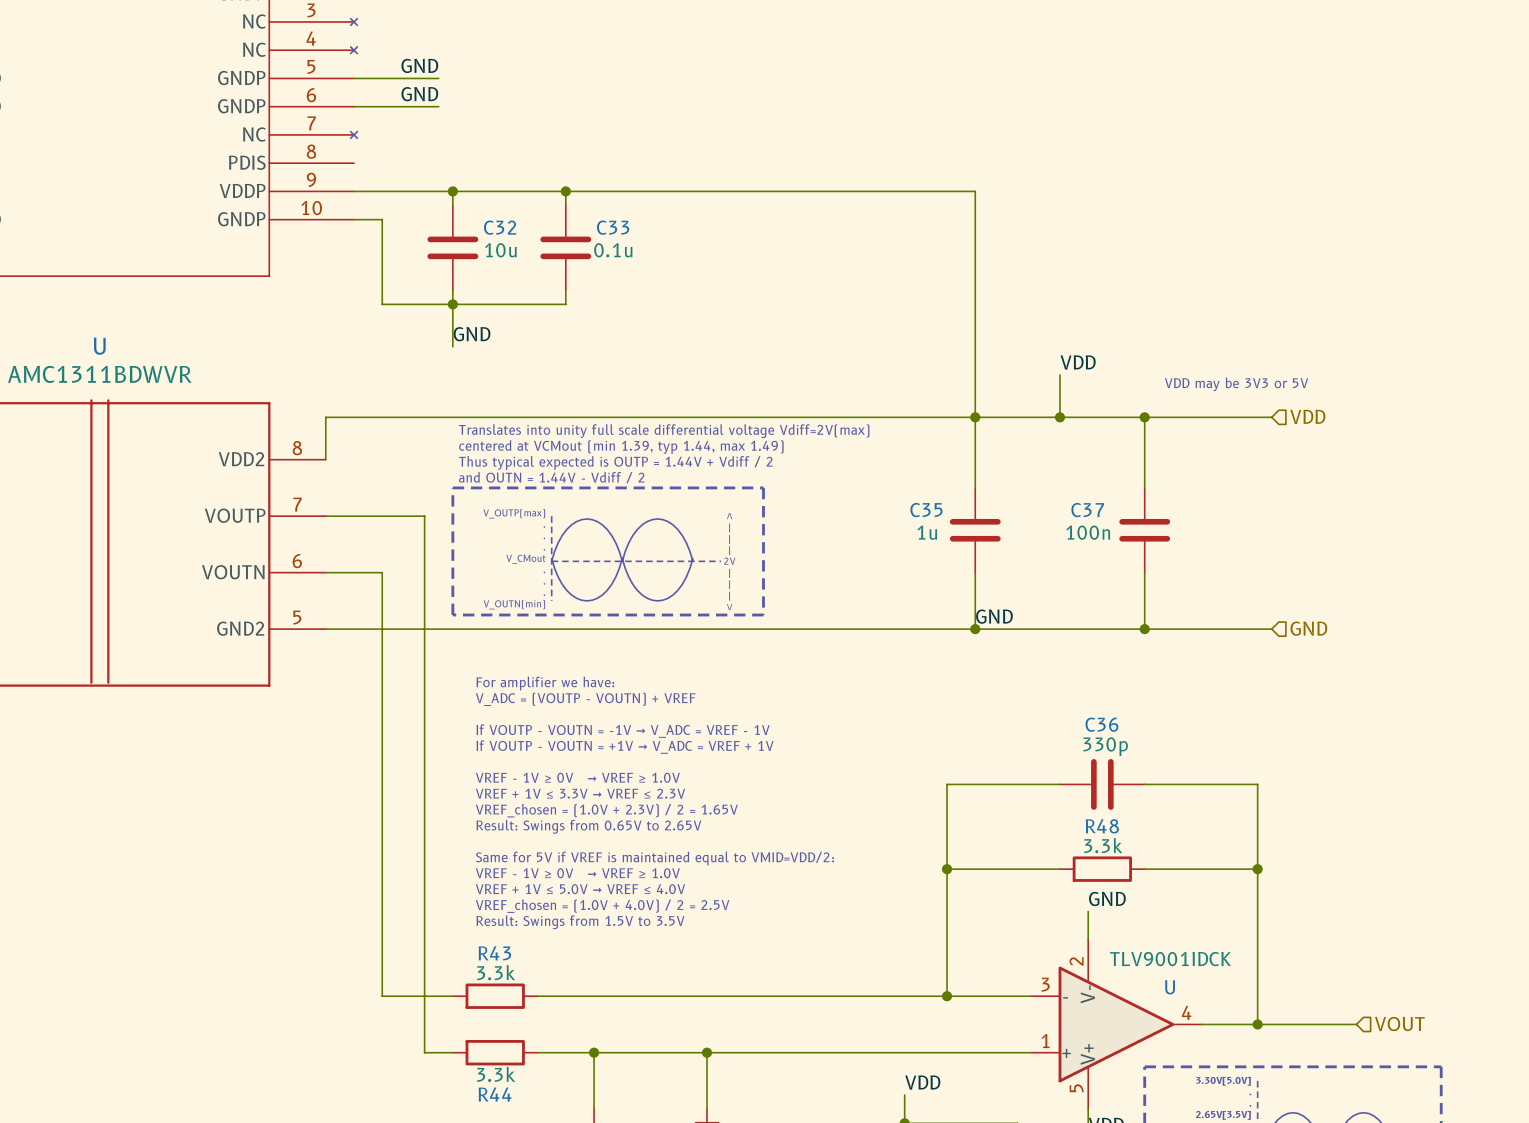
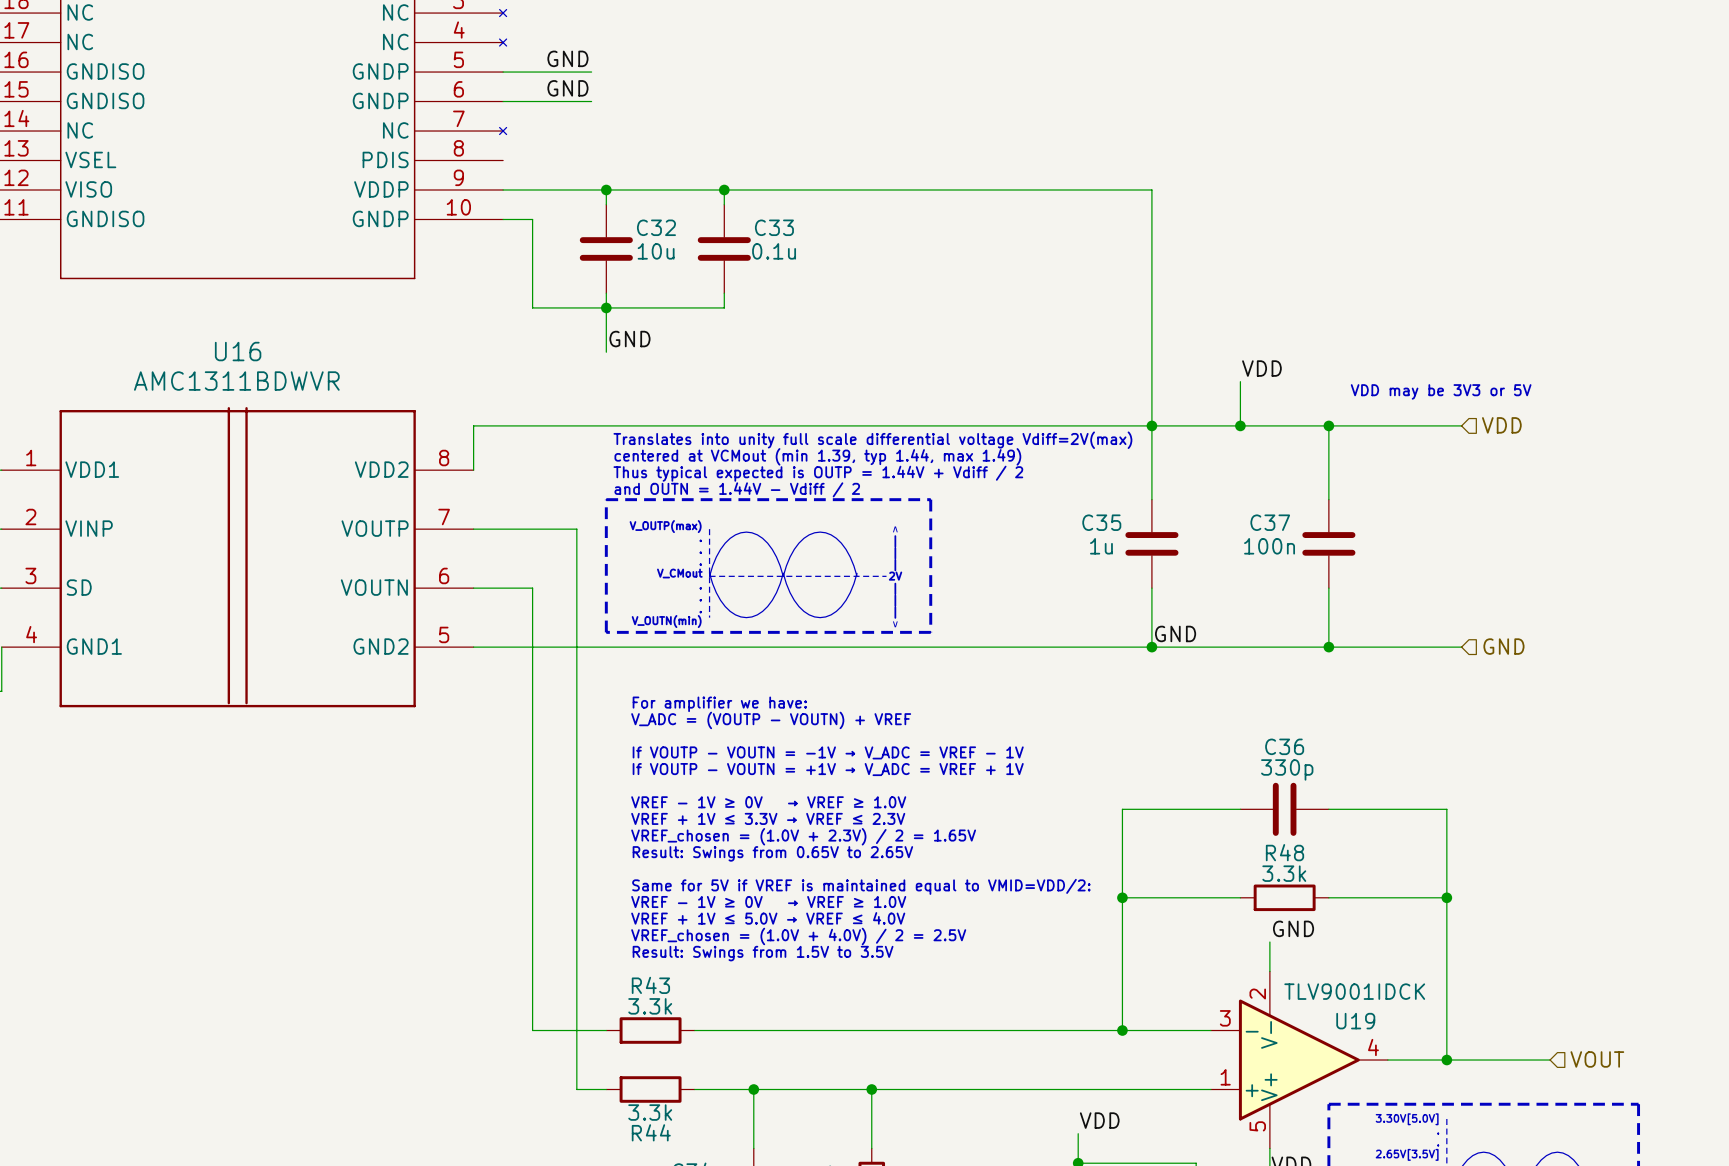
U name: U (99, 346) -> U16 (238, 351)
U name: U (1169, 987) -> U19 (1355, 1021)

